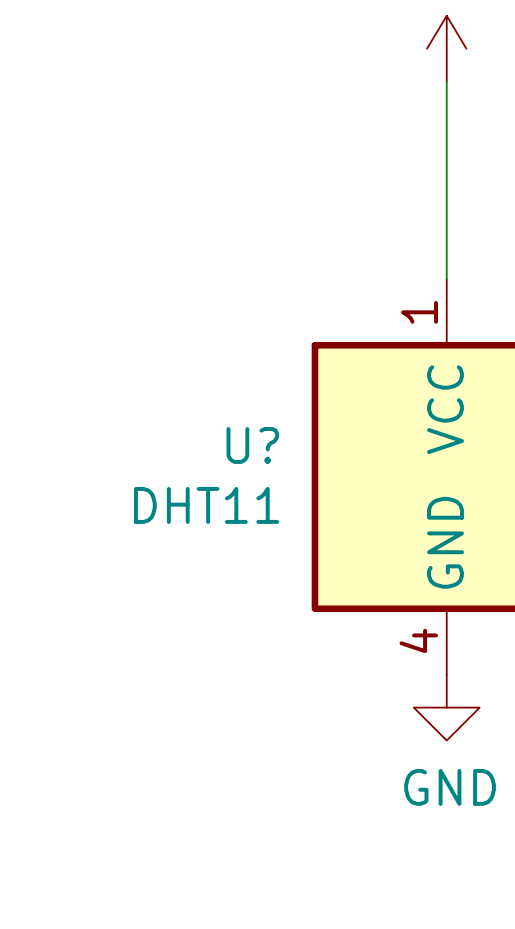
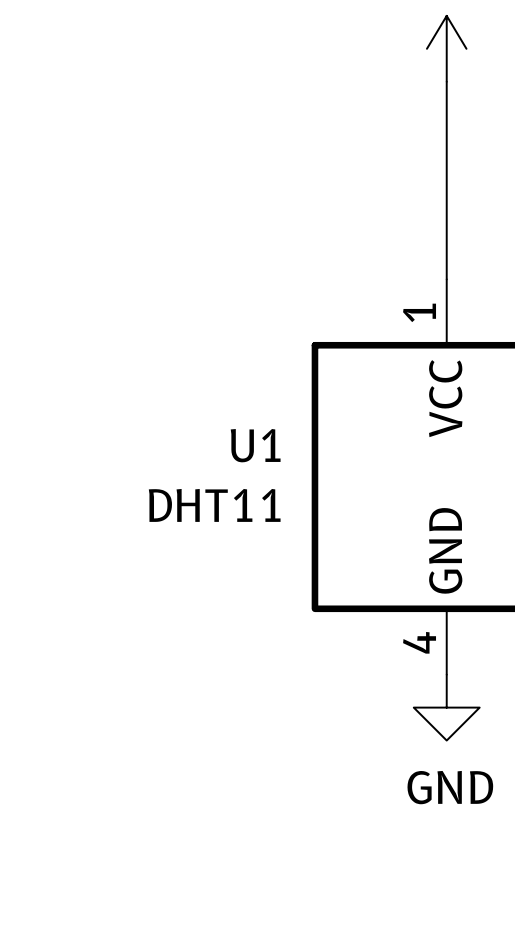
U? name: U? (252, 445) -> U1 (255, 445)

